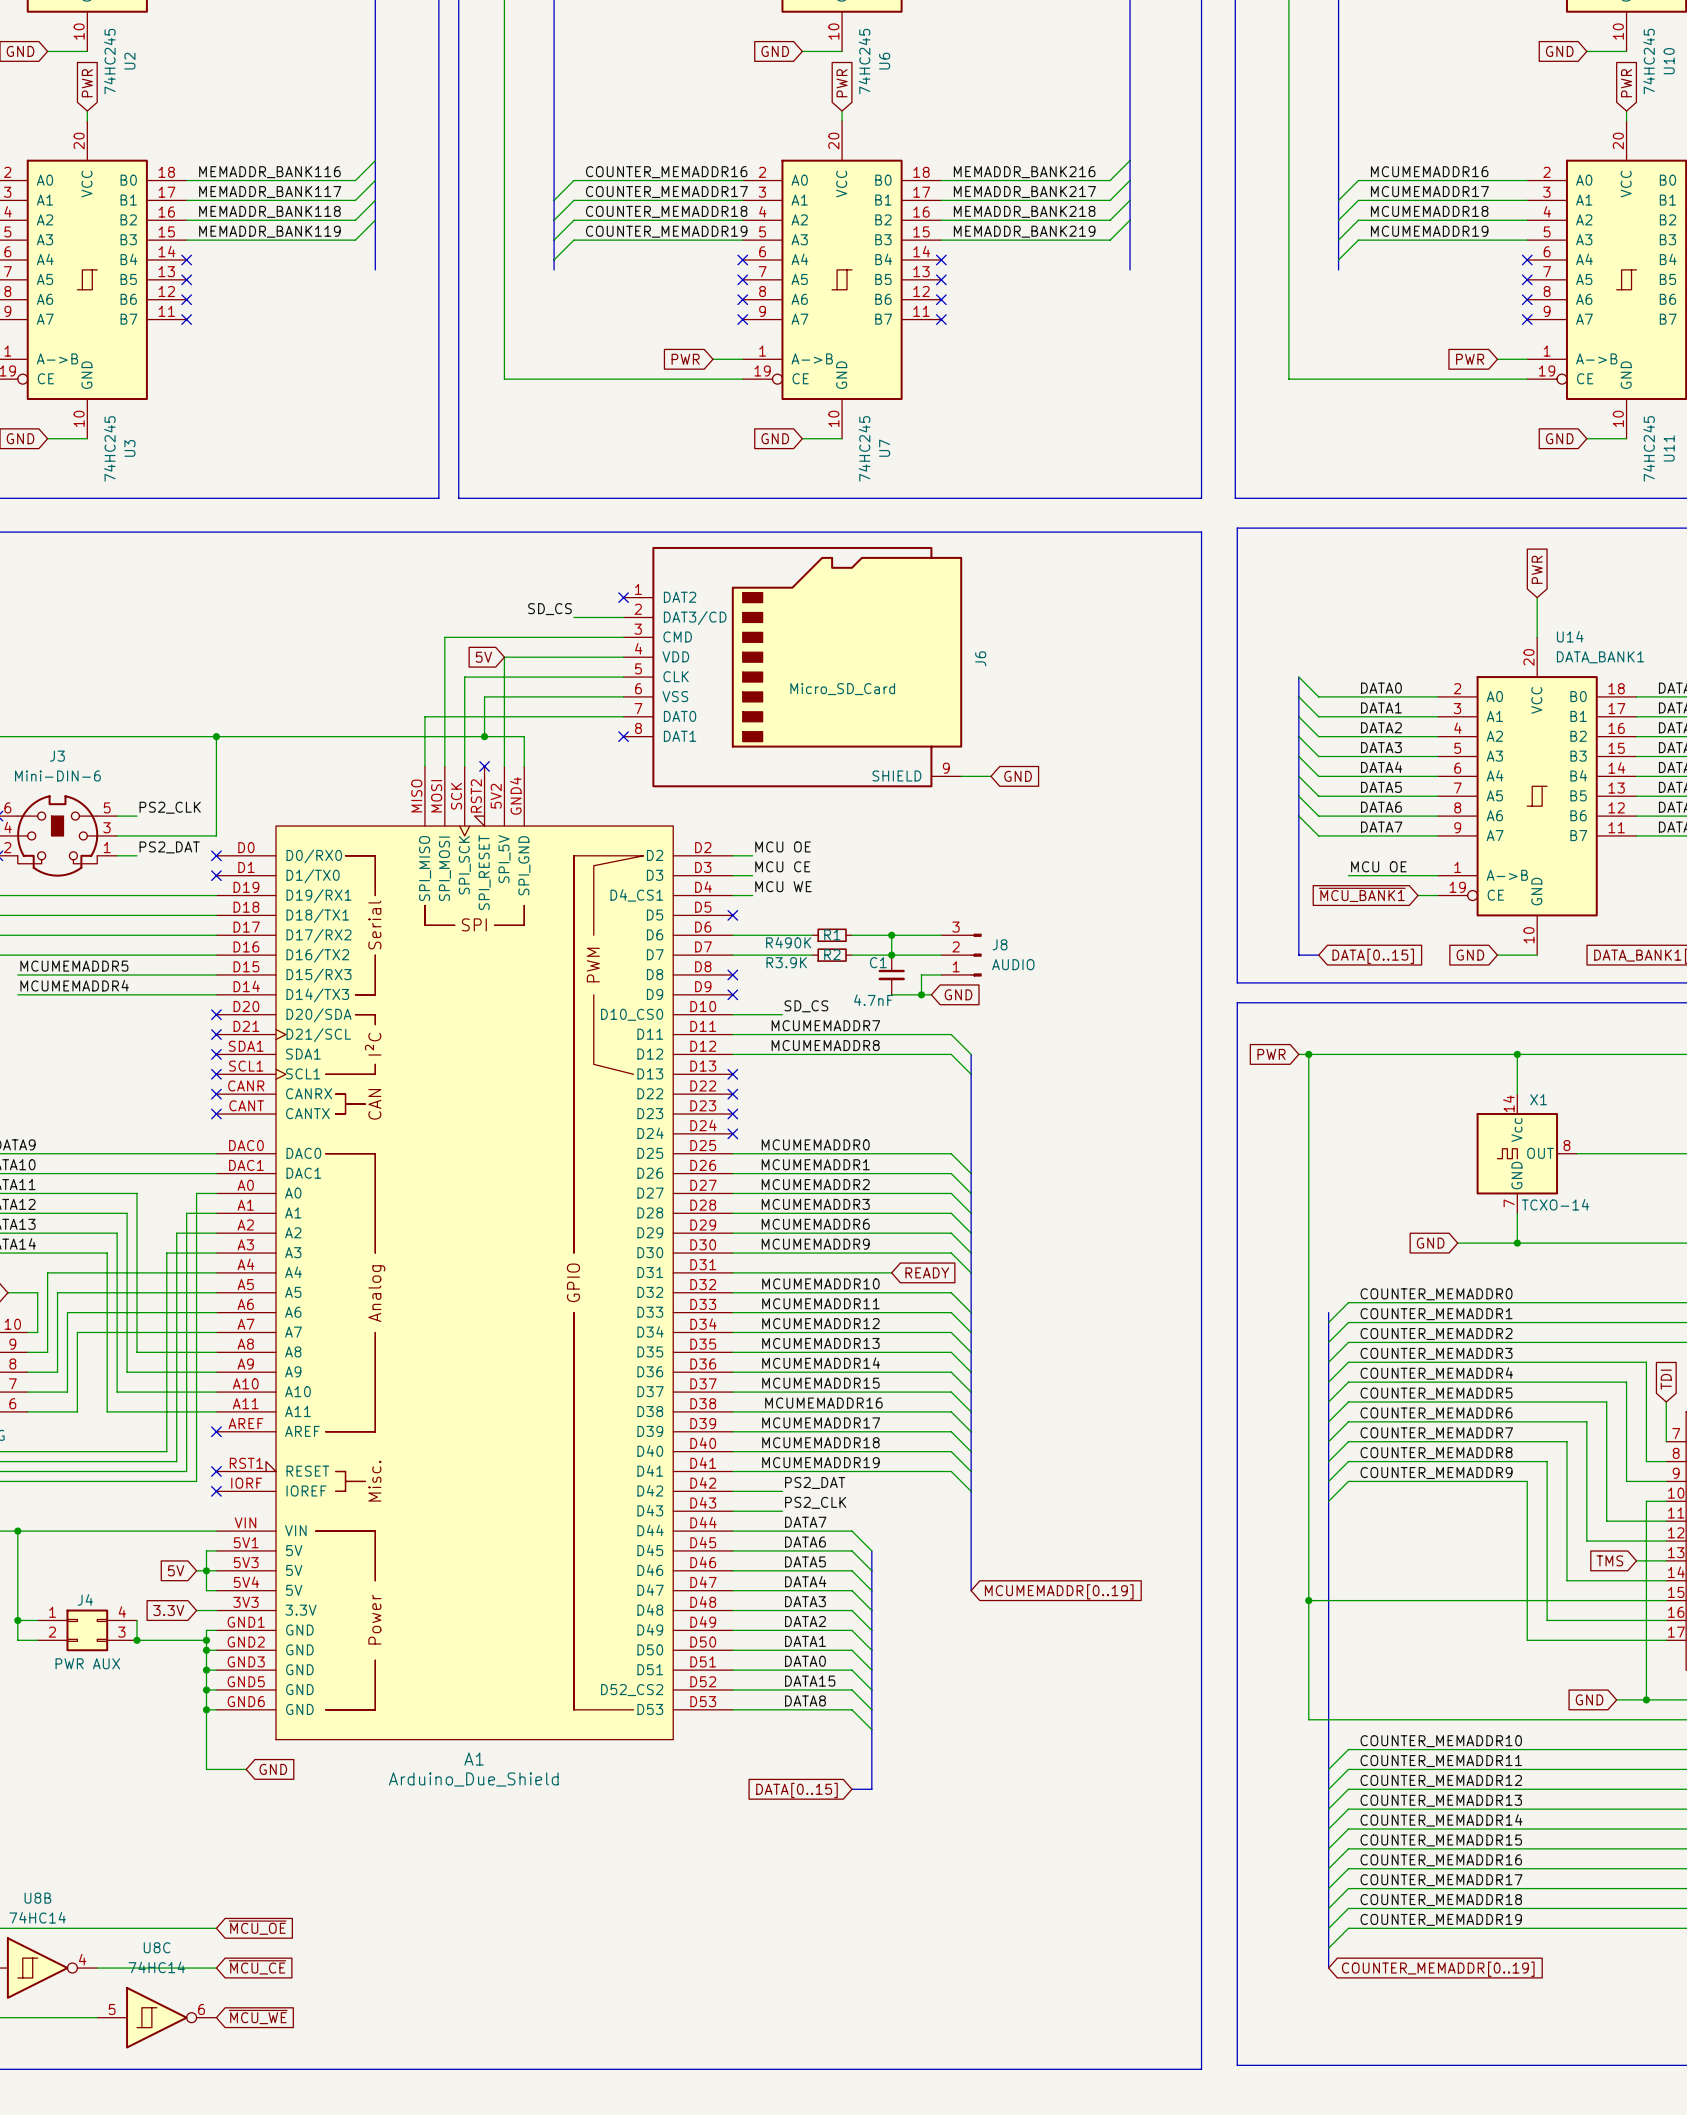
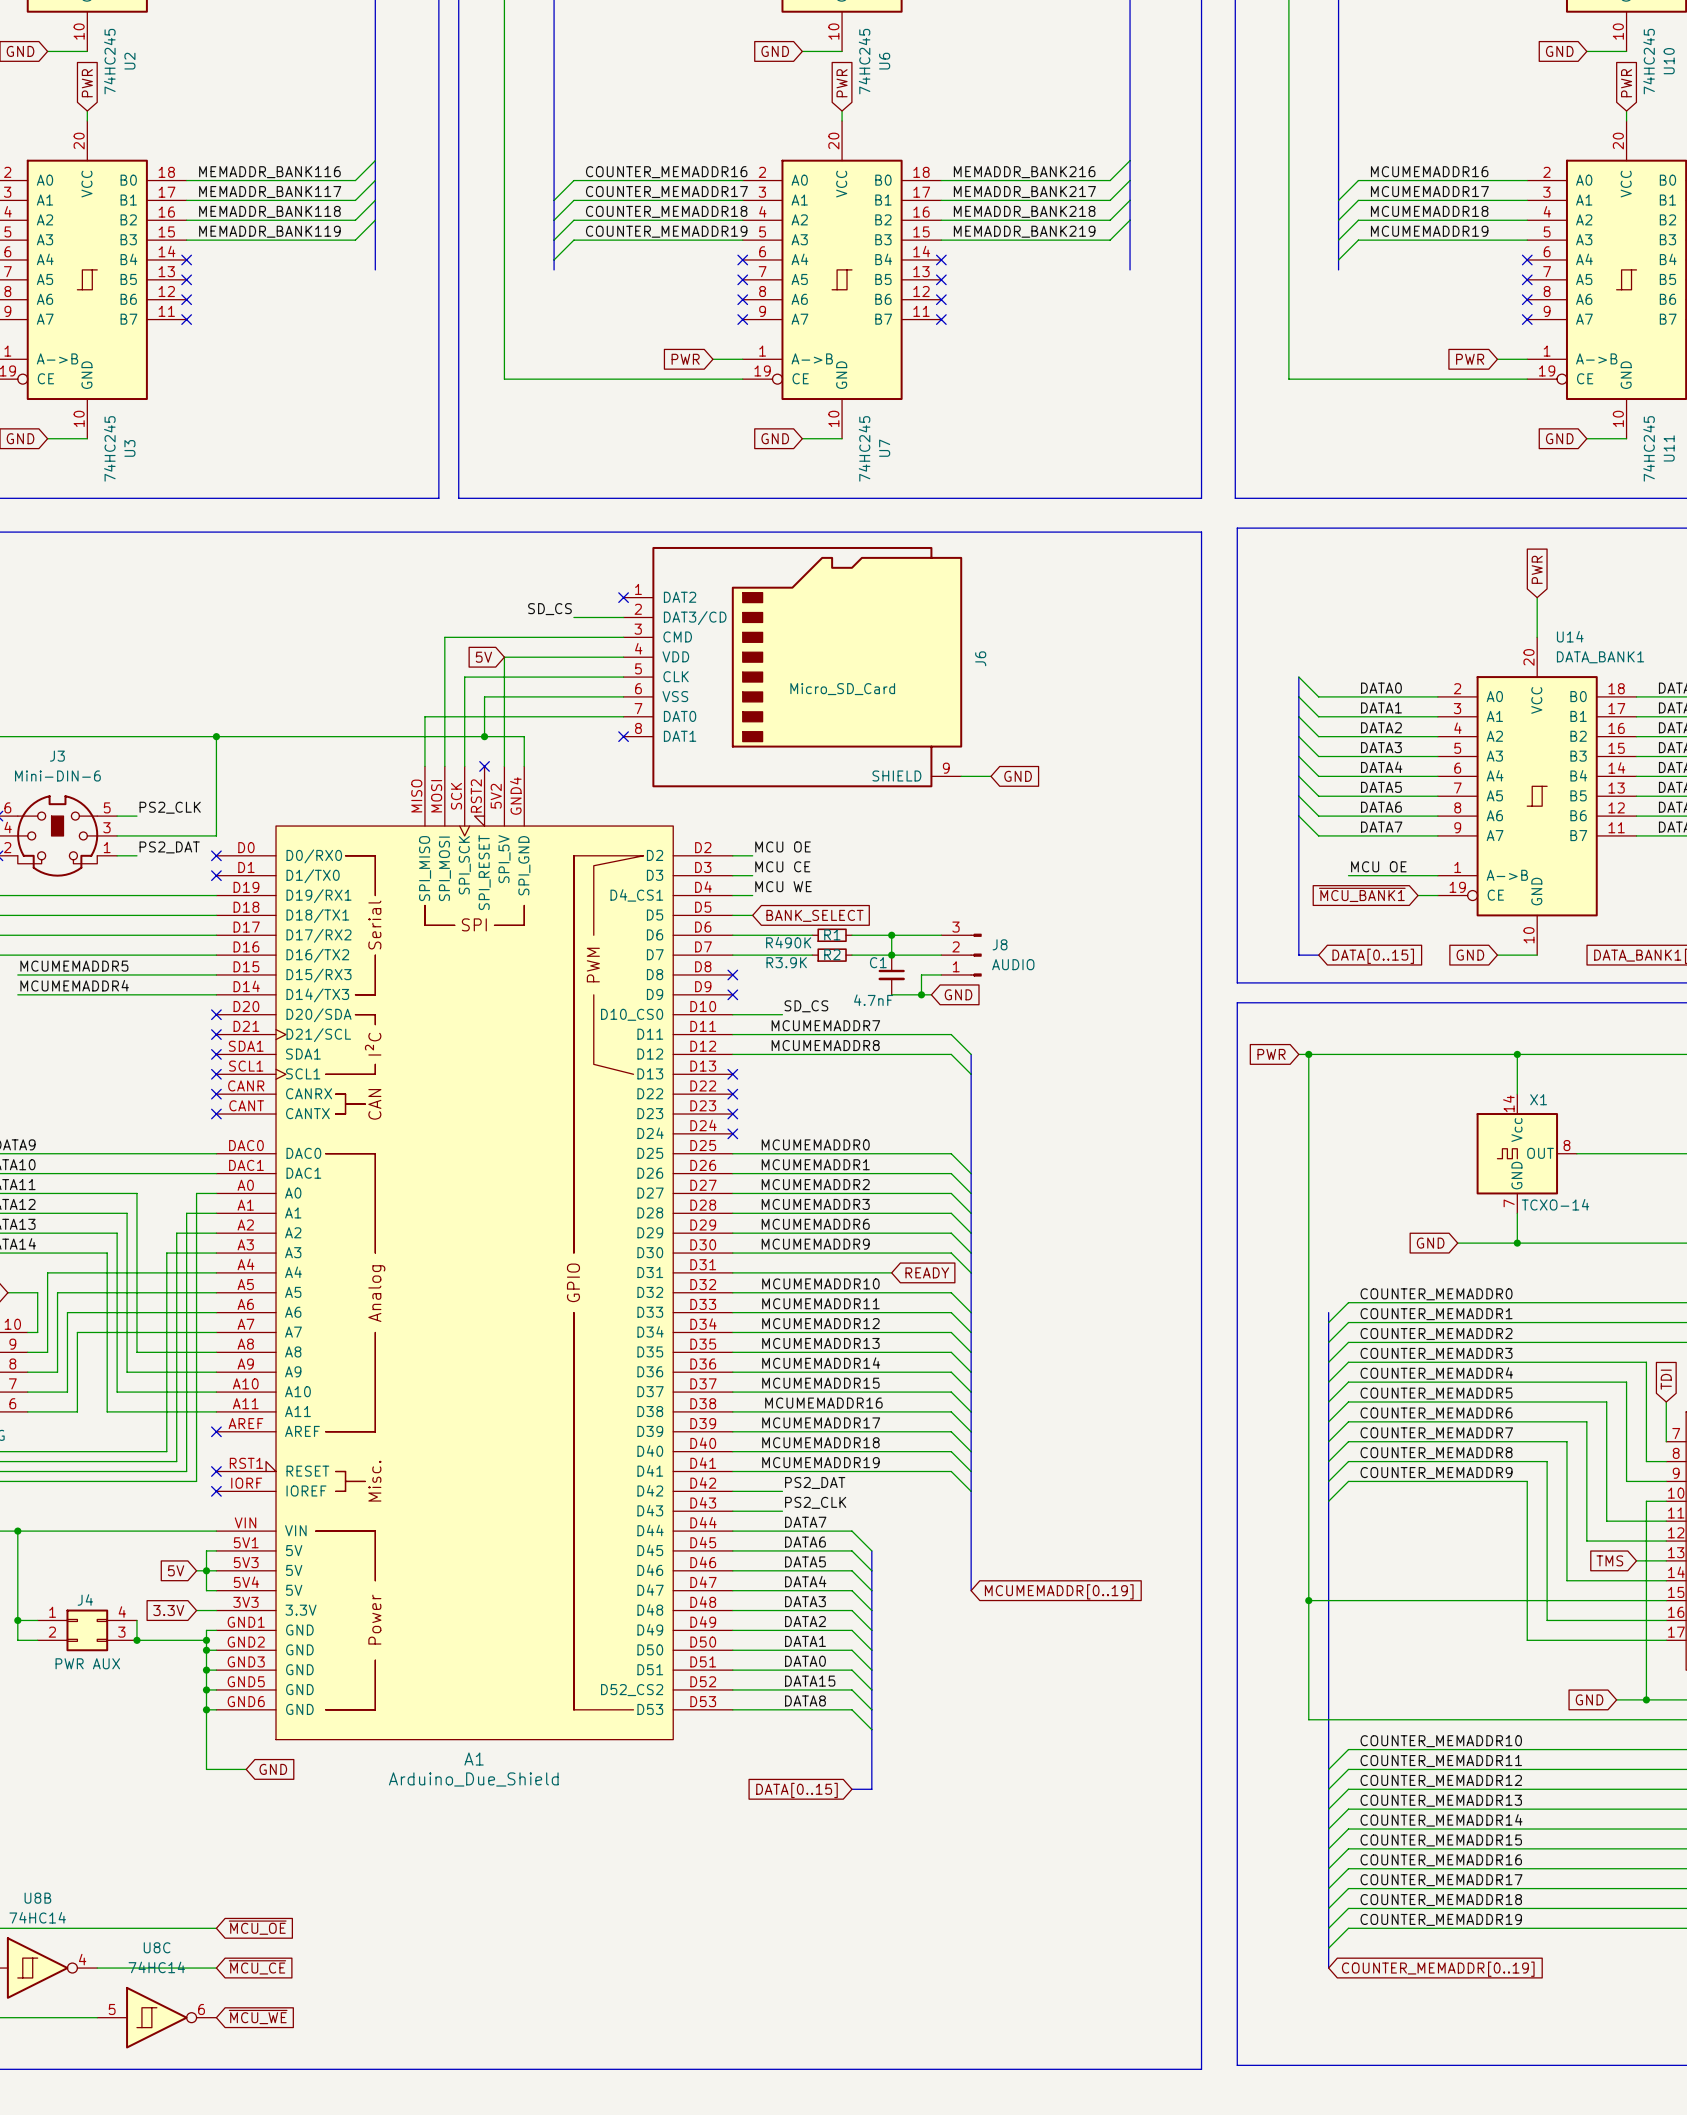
wire: none -> (732, 915) (752, 915)
no-connect mark: (732, 915) -> none
global label: none -> BANK_SELECT (814, 915)

